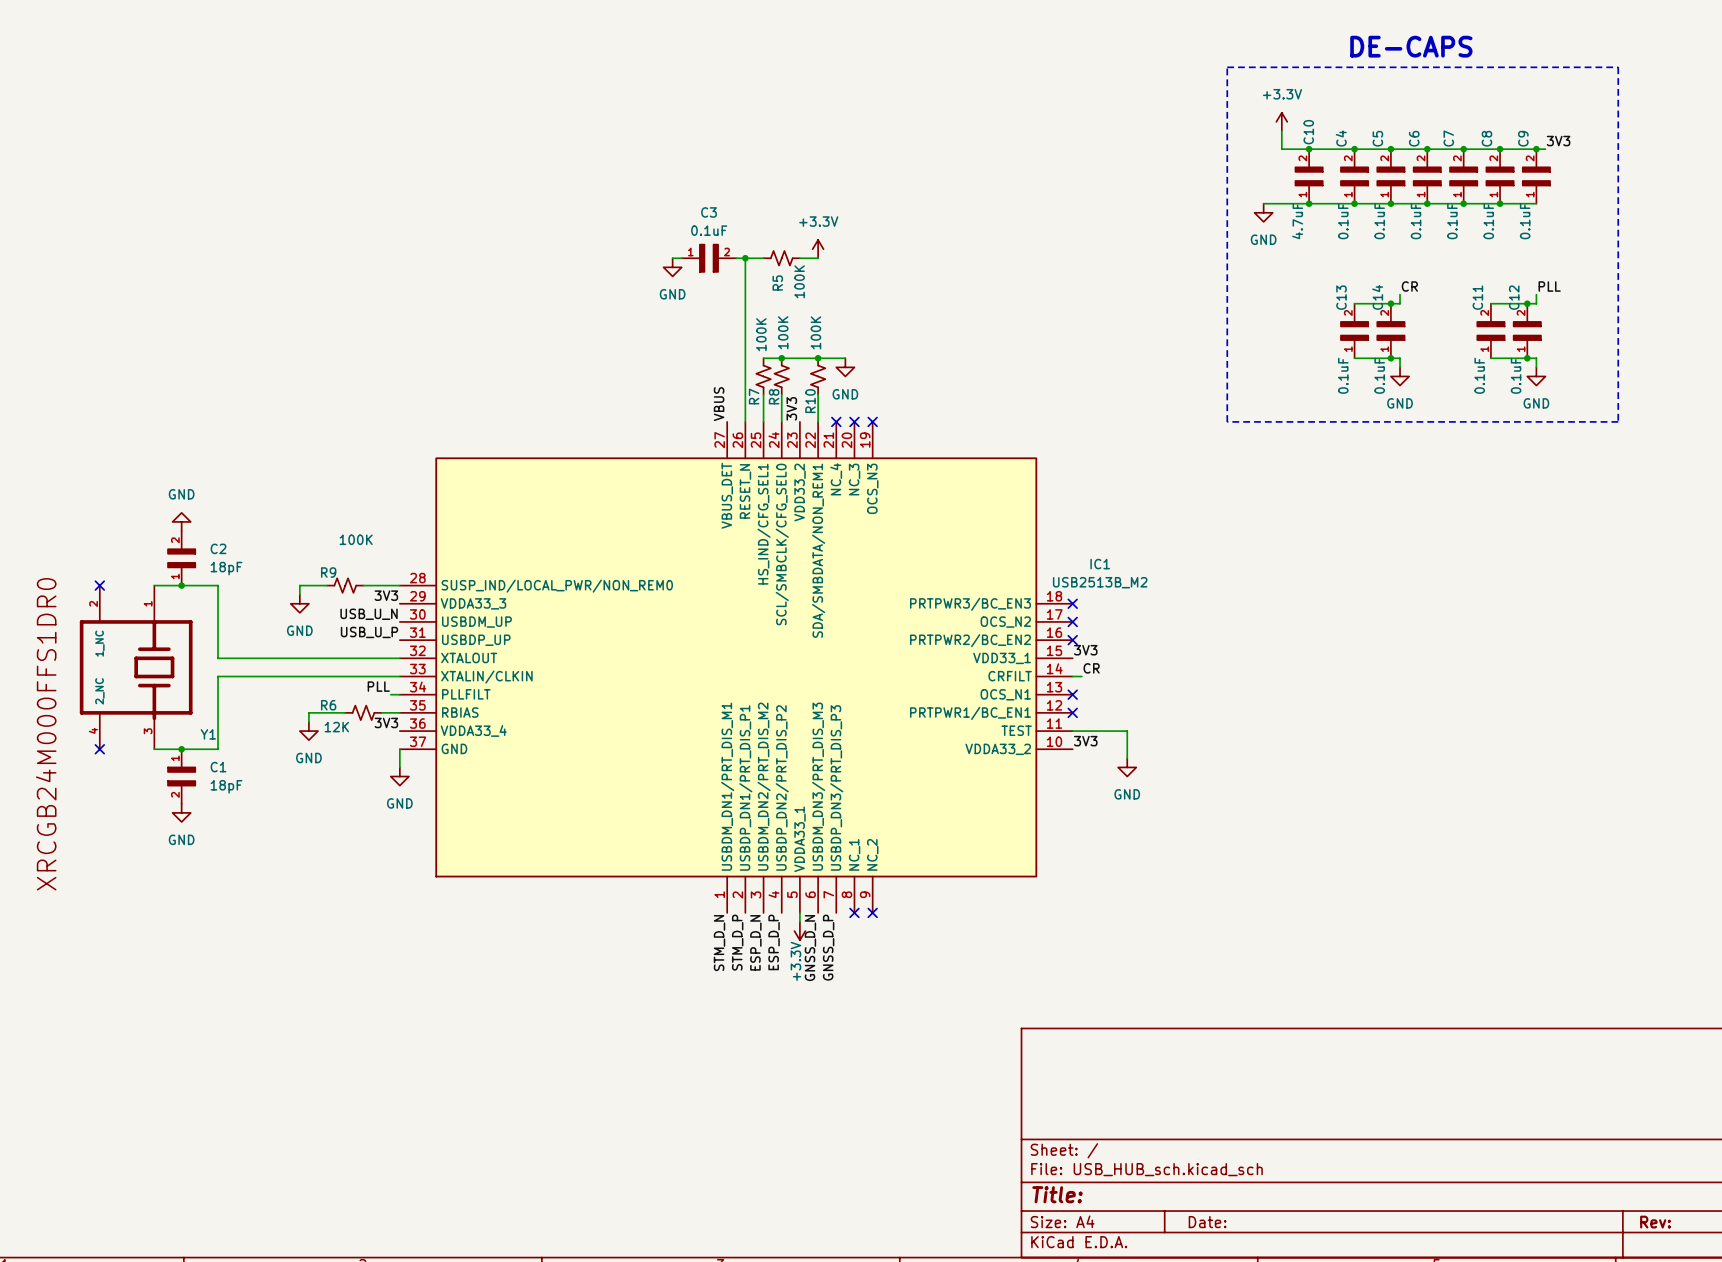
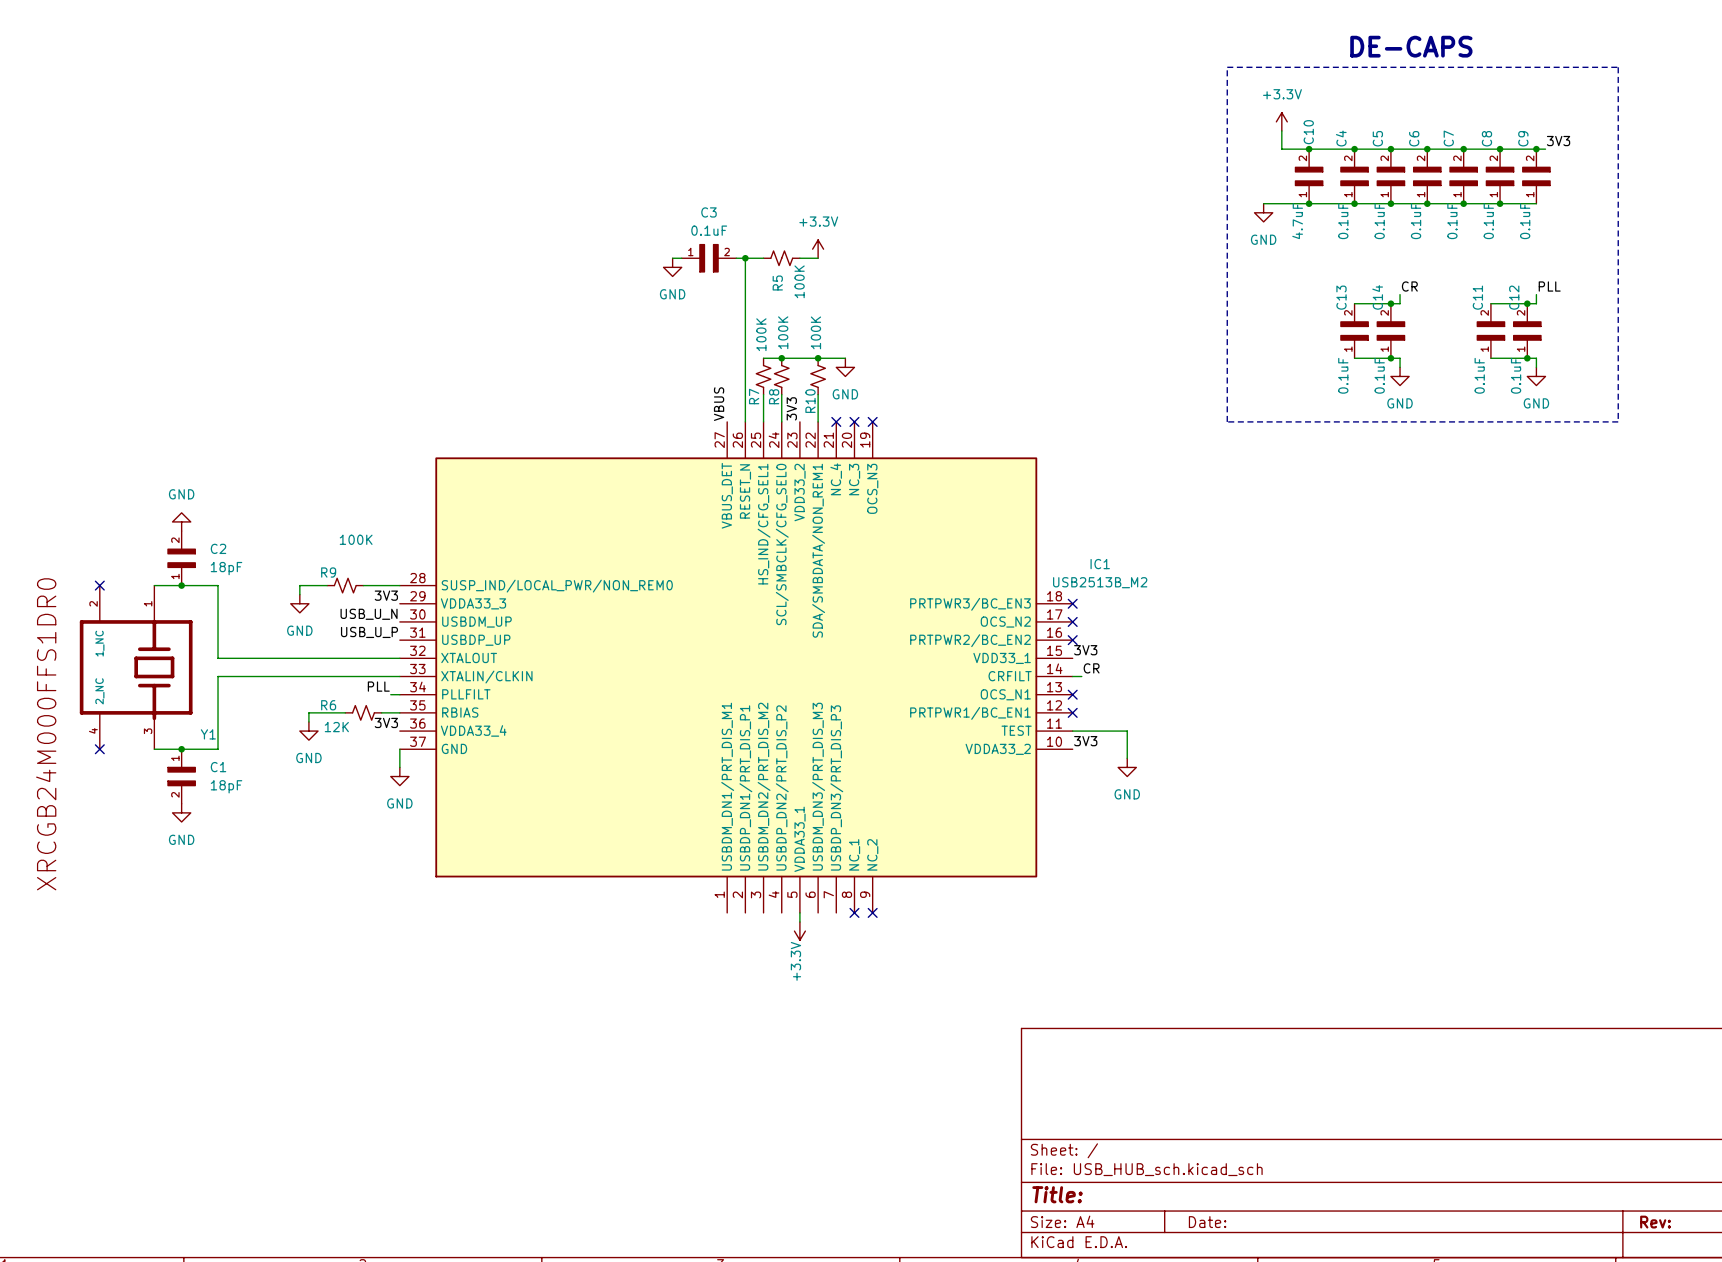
label: STM_D_P (737, 942) -> none
label: ESP_D_N (755, 942) -> none
label: ESP_D_P (774, 942) -> none
label: STM_D_N (719, 943) -> none
label: GNSS_D_P (828, 947) -> none
label: GNSS_D_N (810, 948) -> none

